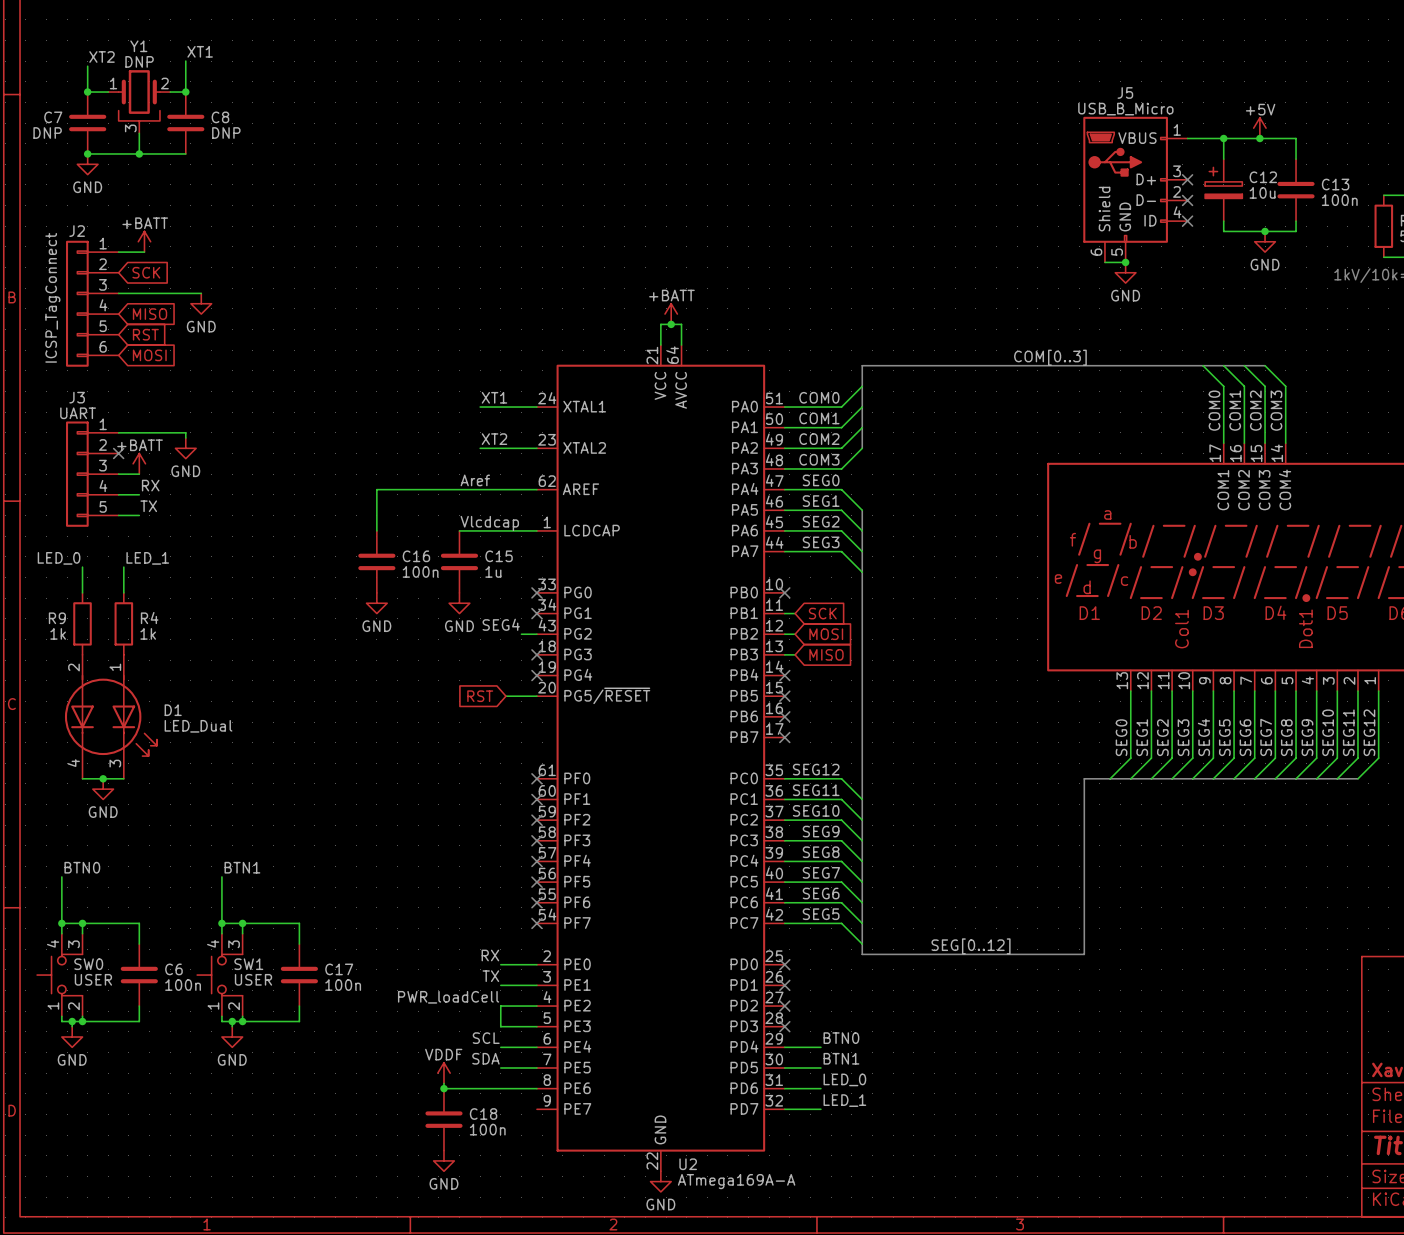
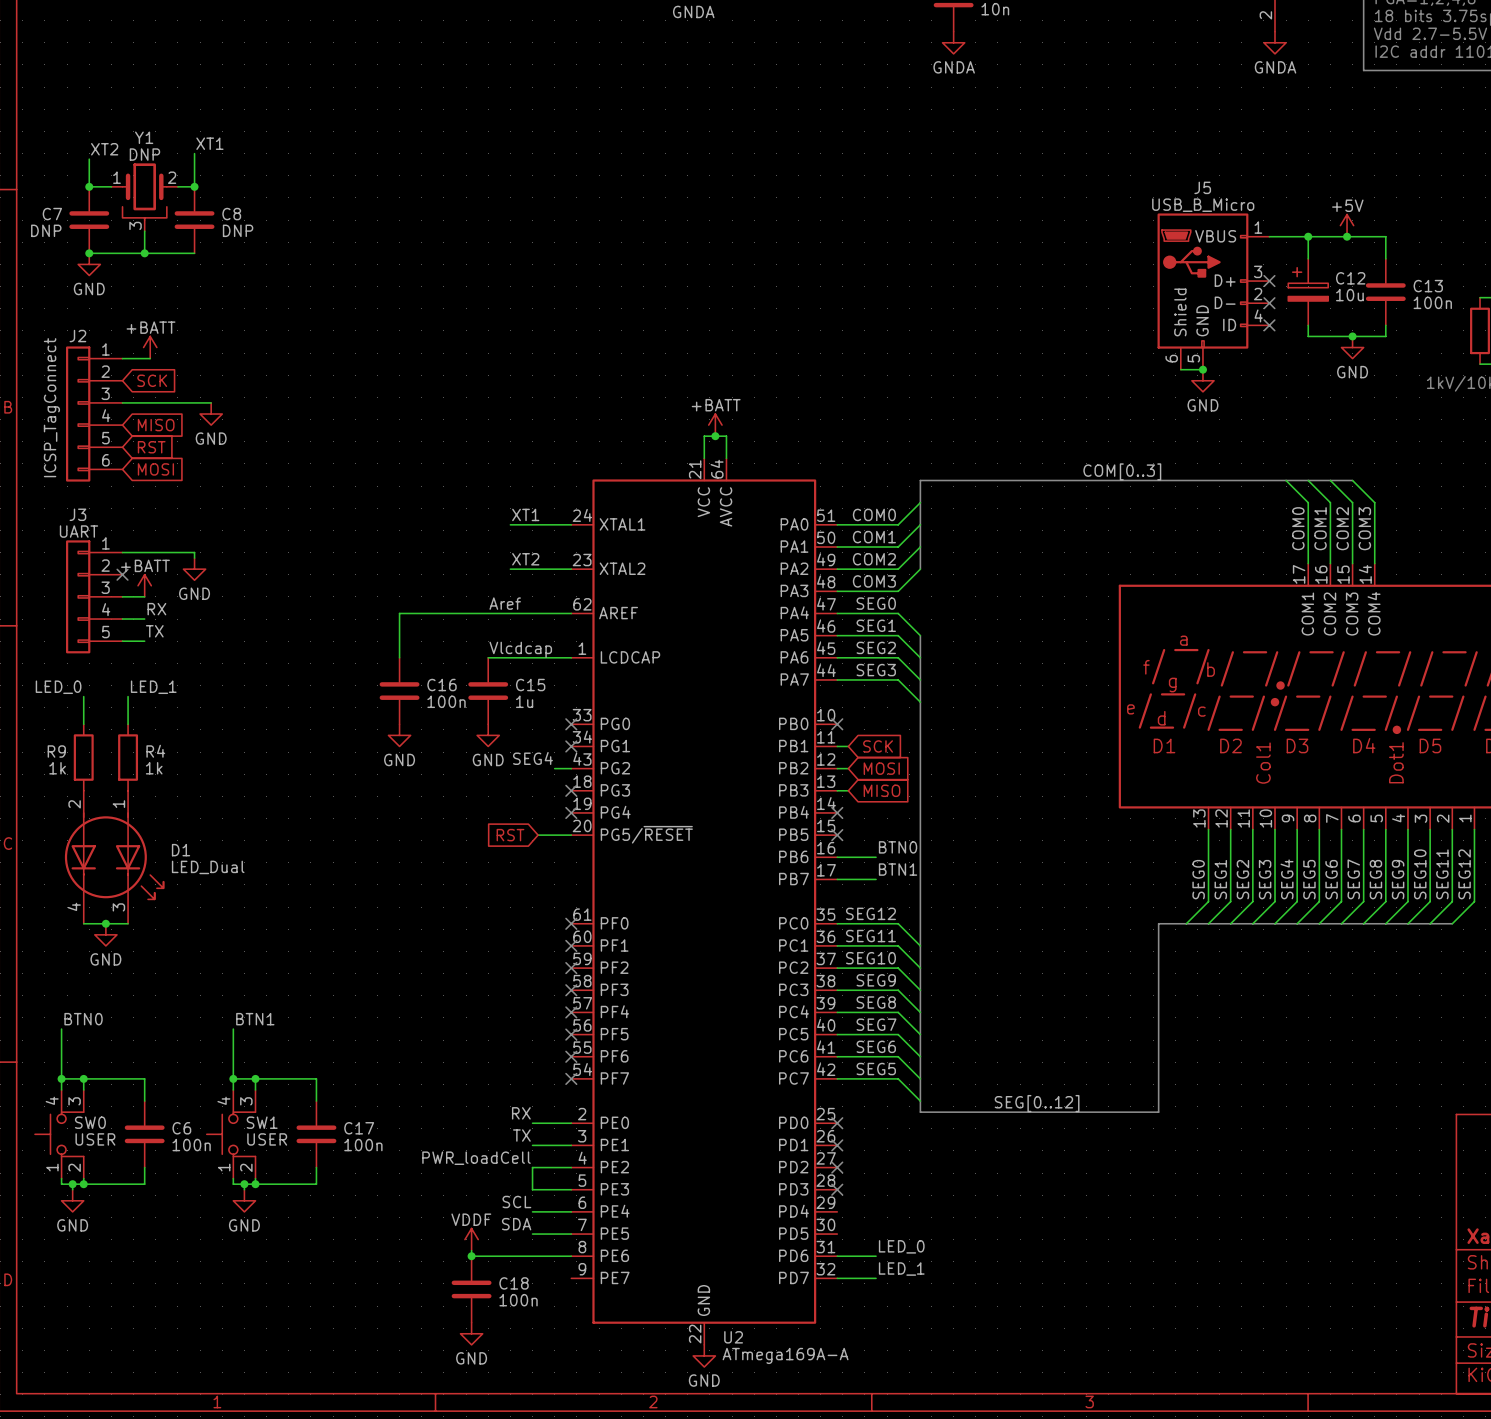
label: none -> BTN0 (898, 847)
wire: none -> (837, 857) (876, 857)
no-connect mark: (784, 716) -> none
label: none -> BTN1 (898, 869)
wire: none -> (837, 879) (876, 879)
no-connect mark: (784, 737) -> none
label: BTN0 (841, 1038) -> none
wire: (784, 1047) (820, 1047) -> none
label: BTN1 (841, 1058) -> none
wire: (784, 1067) (820, 1067) -> none

